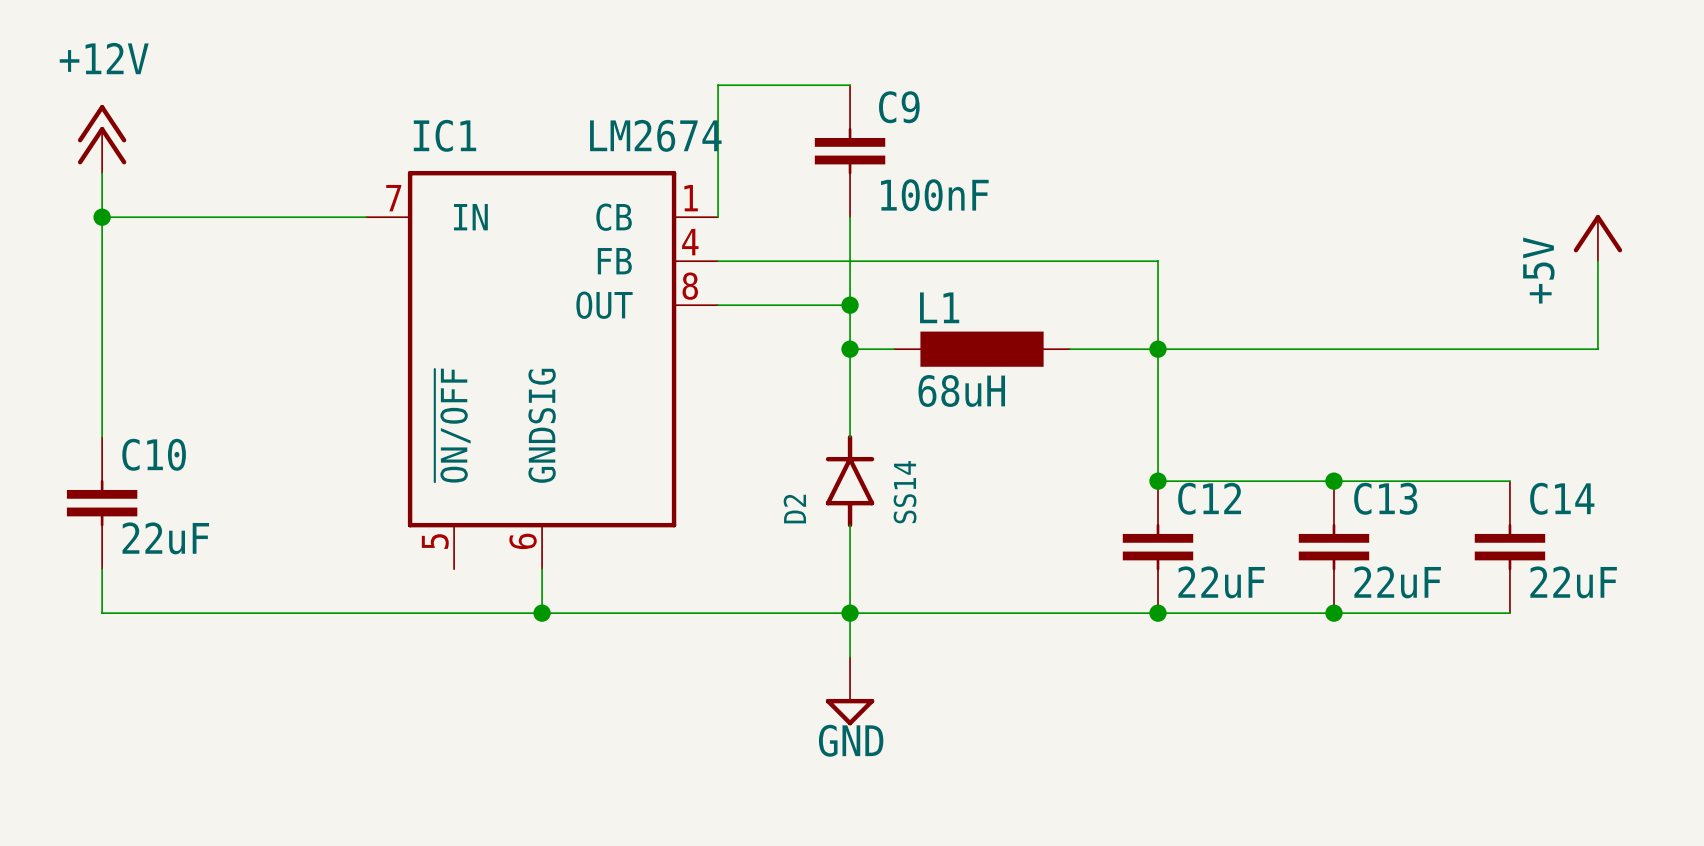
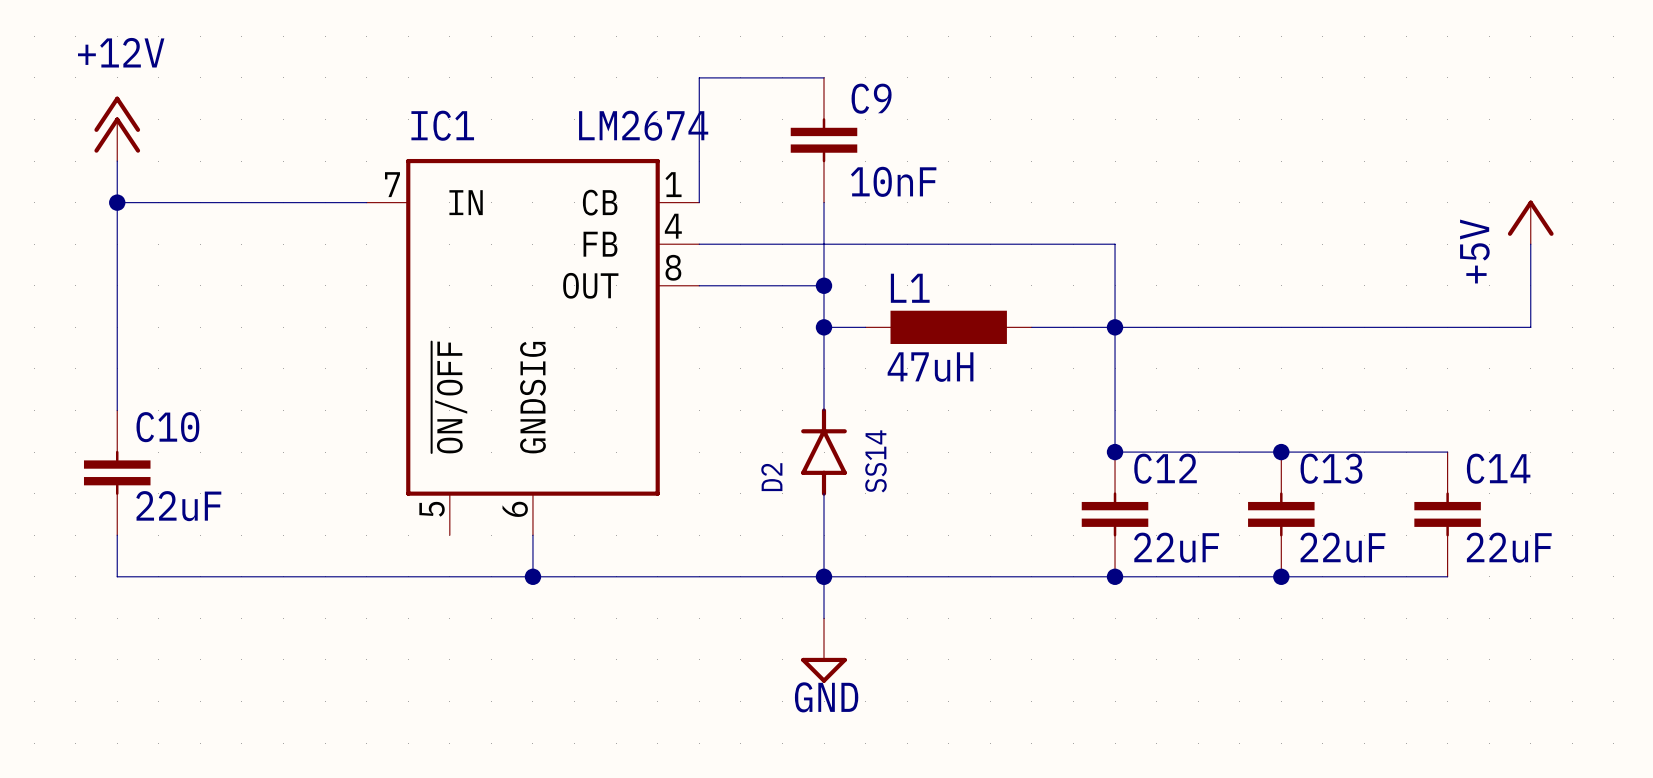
C9 value: 100nF (934, 195) -> 10nF (893, 181)
L1 value: 68uH (961, 391) -> 47uH (930, 367)

